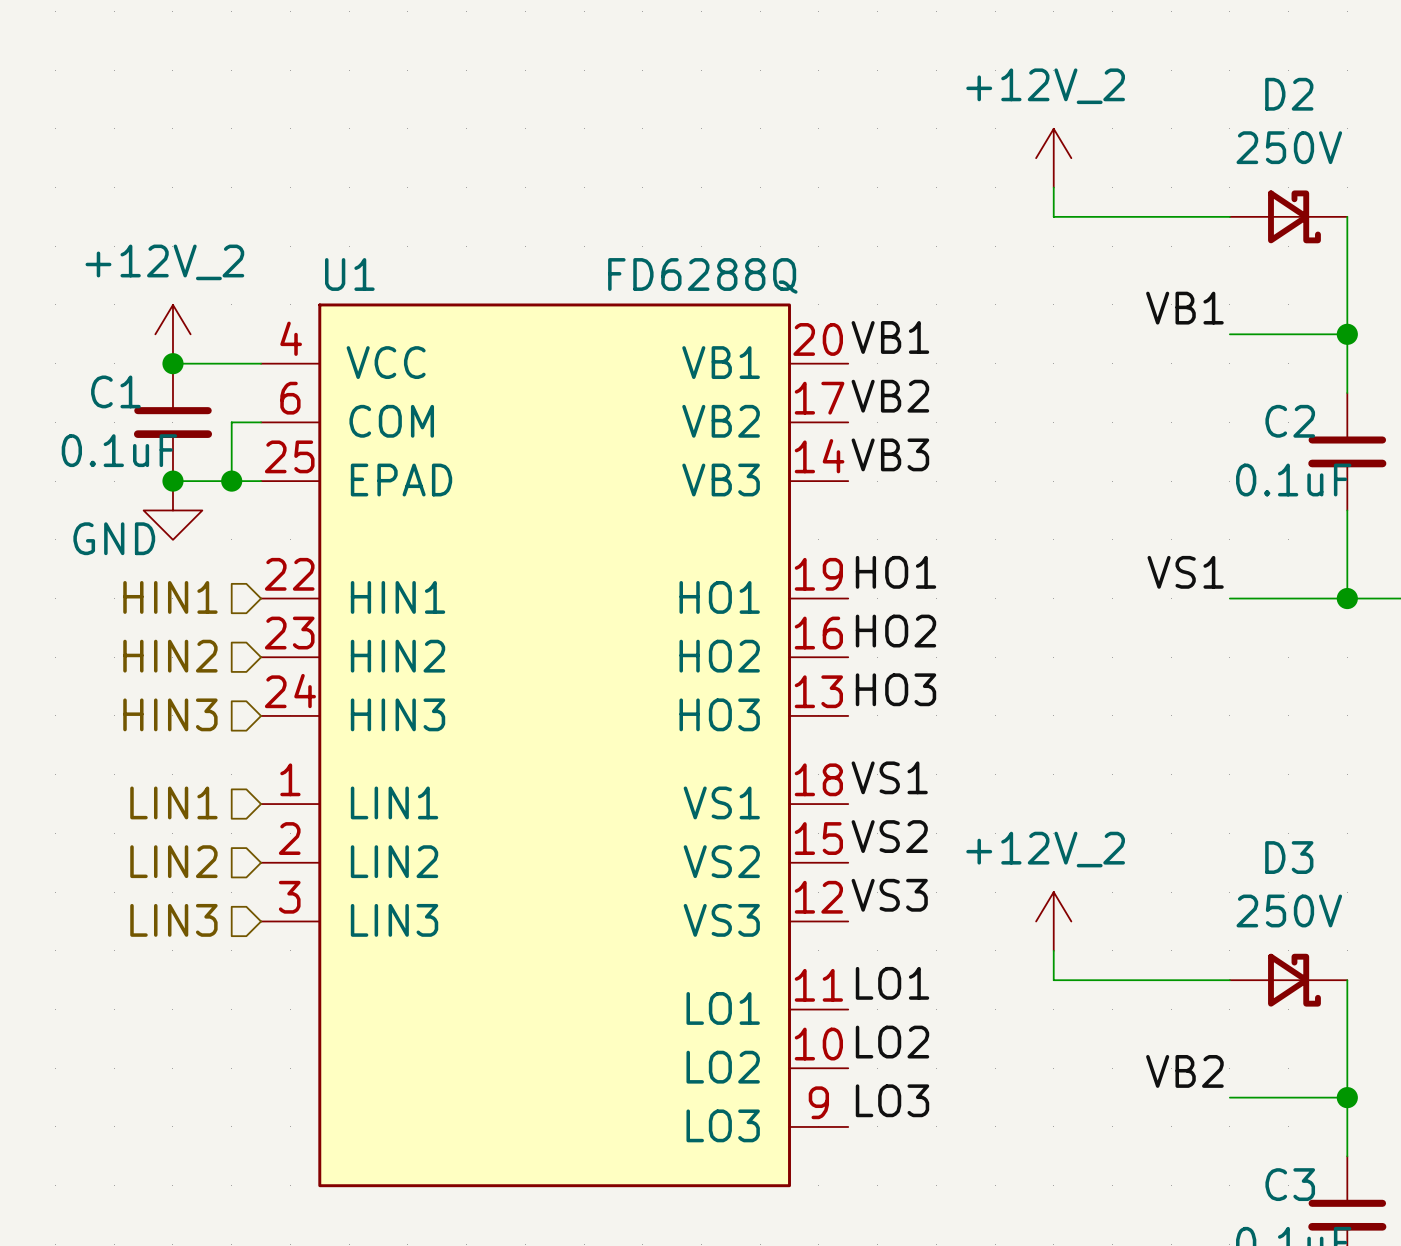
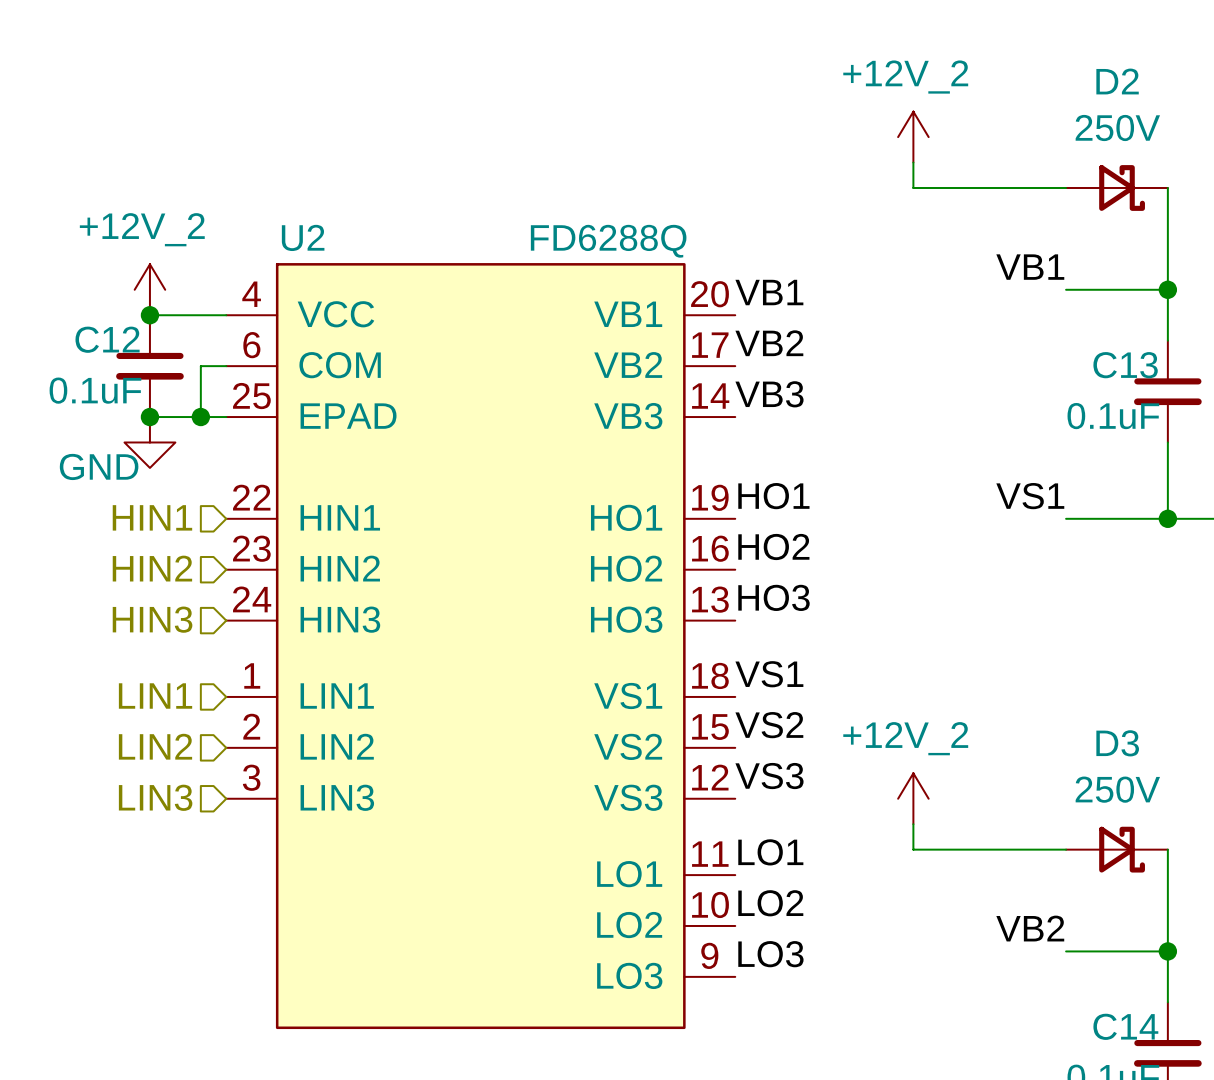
U1 name: U1 (349, 274) -> U2 (303, 237)
C1 name: C1 (115, 391) -> C12 (107, 339)
C2 name: C2 (1290, 421) -> C13 (1125, 365)
C3 name: C3 (1290, 1184) -> C14 (1125, 1026)

